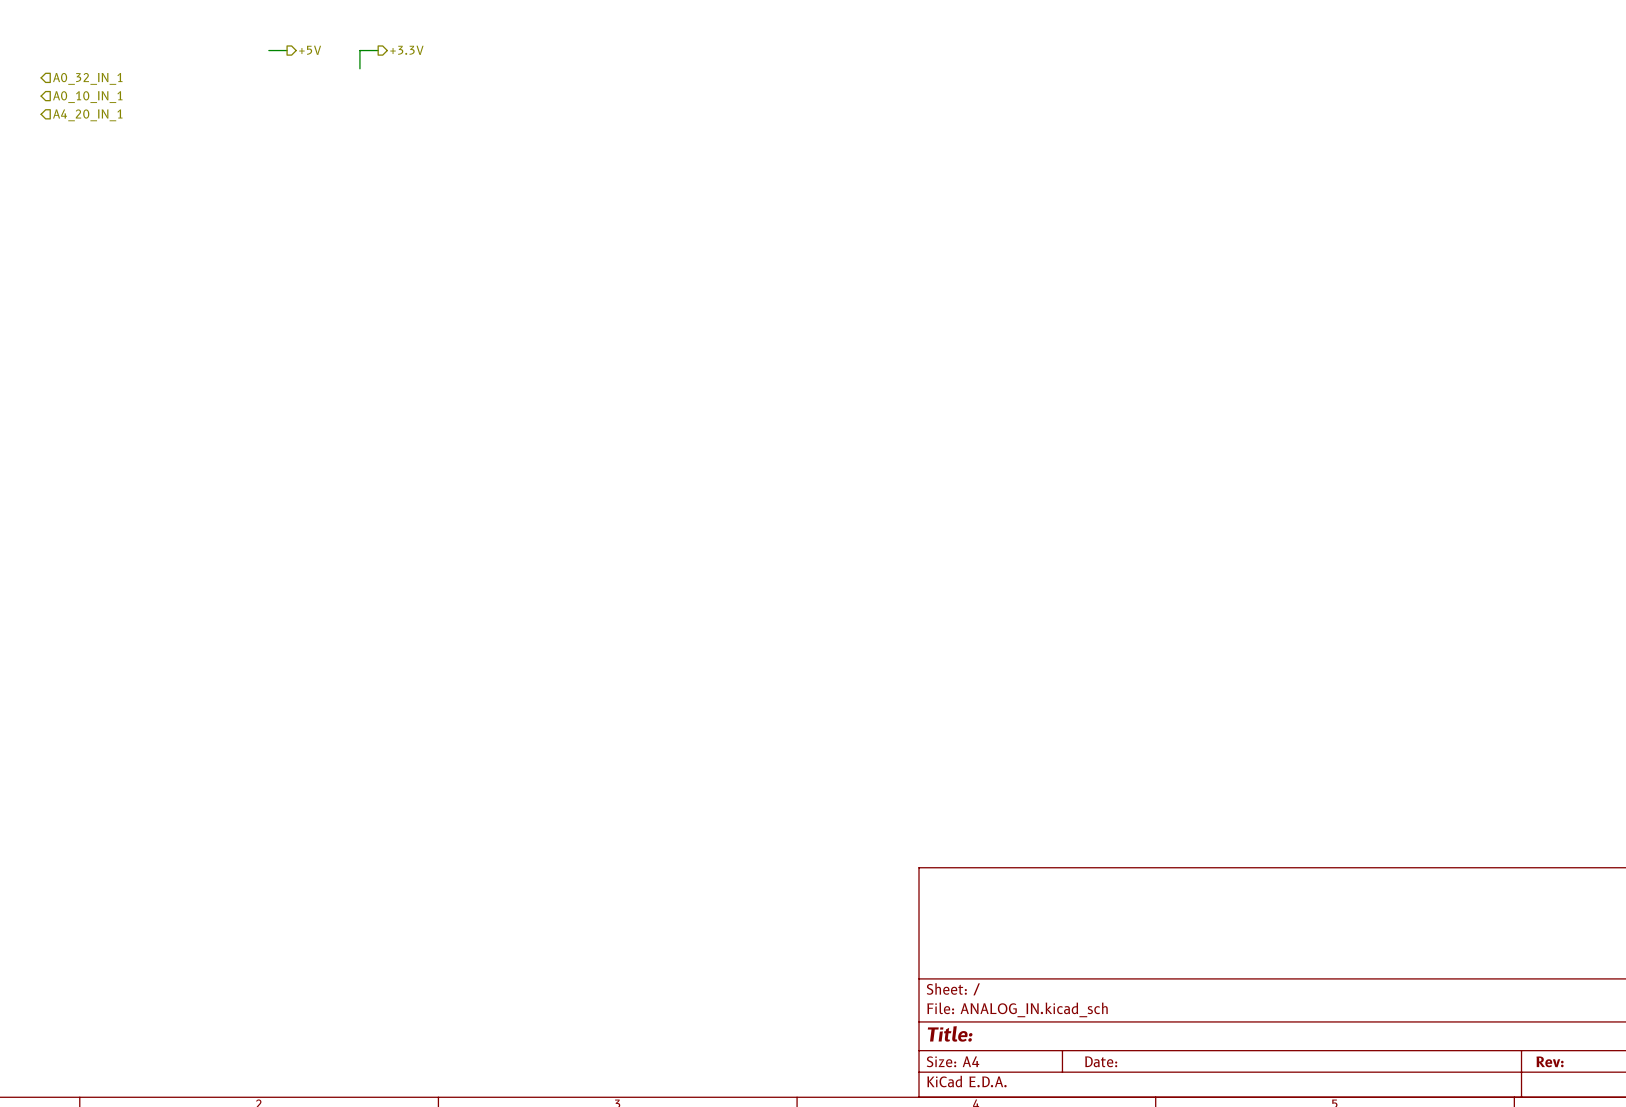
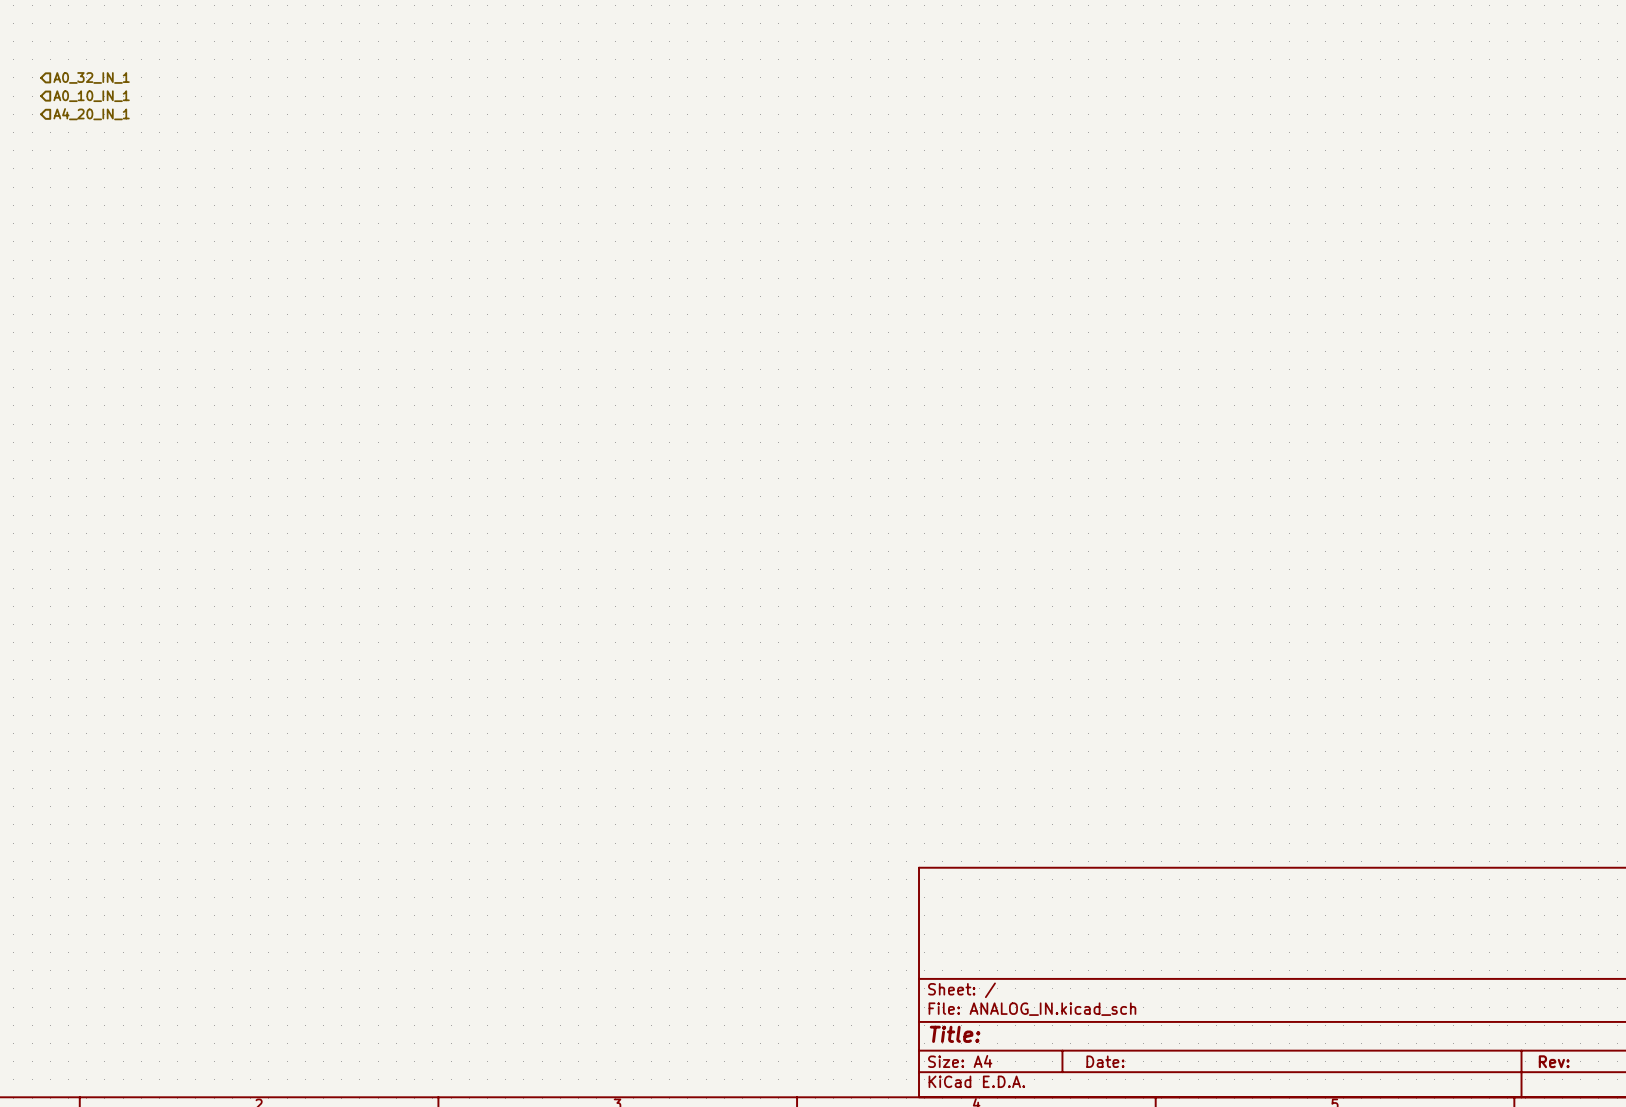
wire: (268, 50) (287, 50) -> none
hierarchical label: +5V (310, 50) -> none
wire: (378, 50) (359, 50) (359, 68) -> none
hierarchical label: +3.3V (406, 50) -> none

